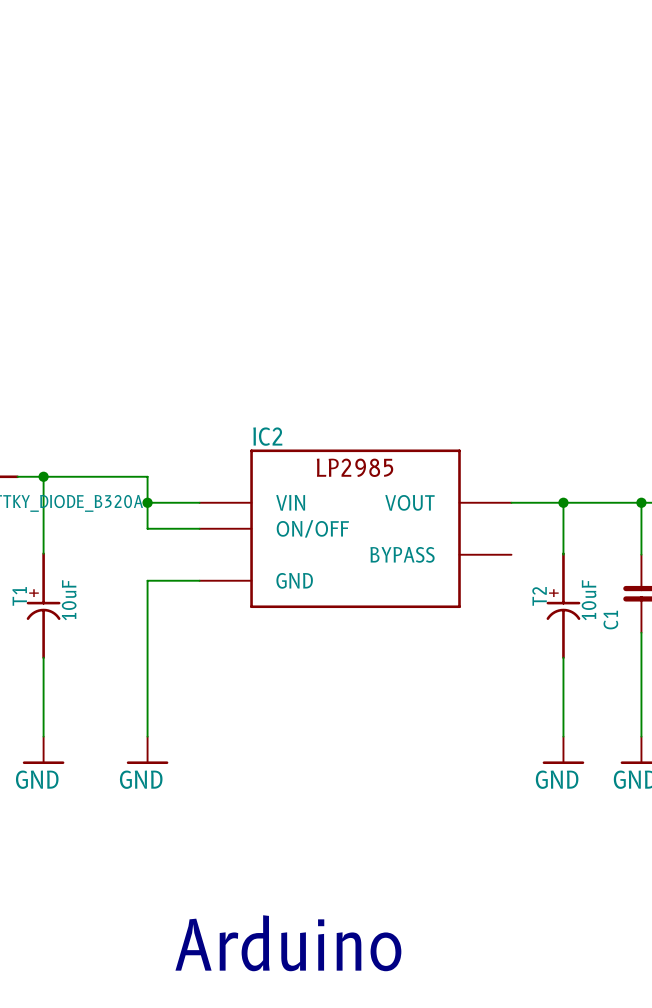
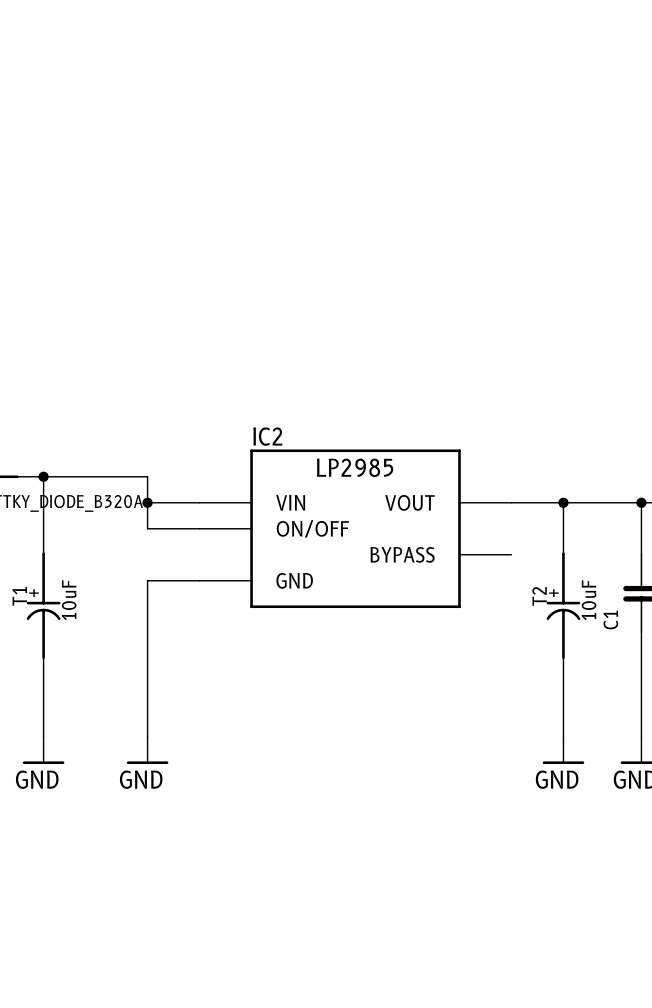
text: Arduino (288, 943) -> none

